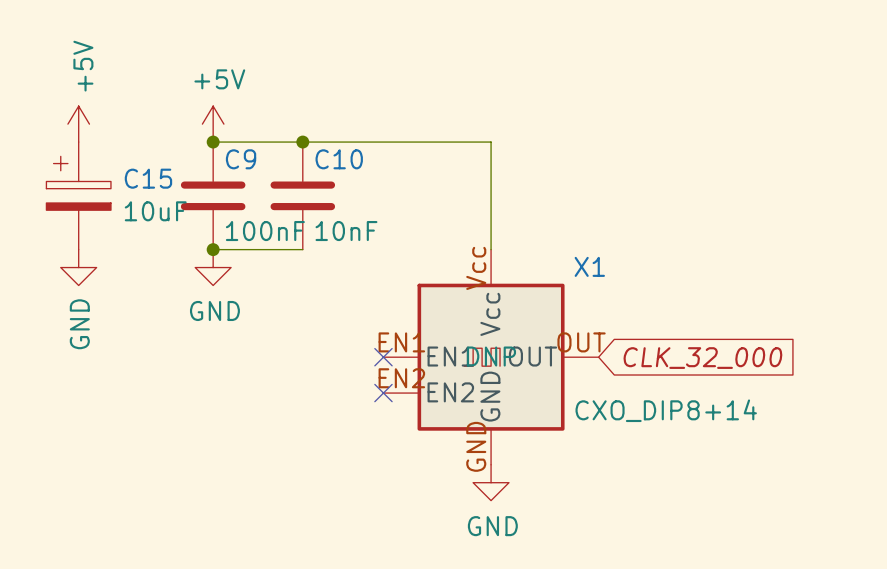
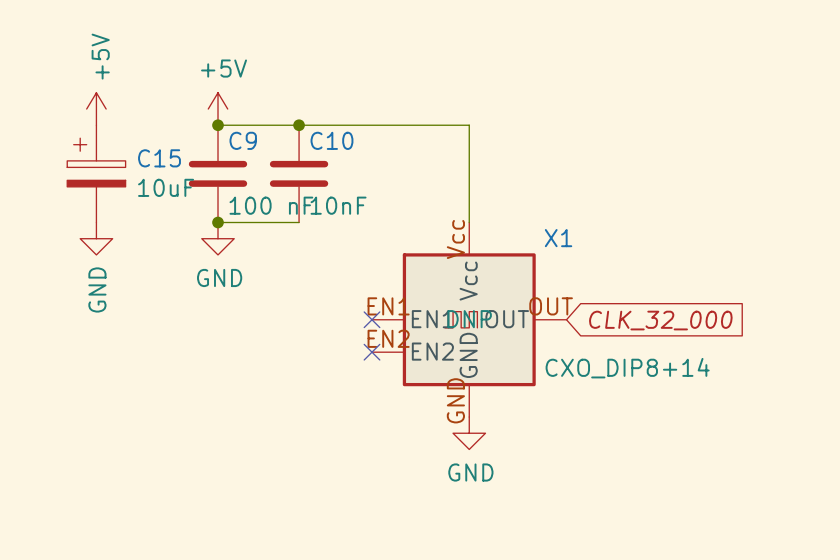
C9 value: 100nF (265, 231) -> 100 nF (271, 205)

